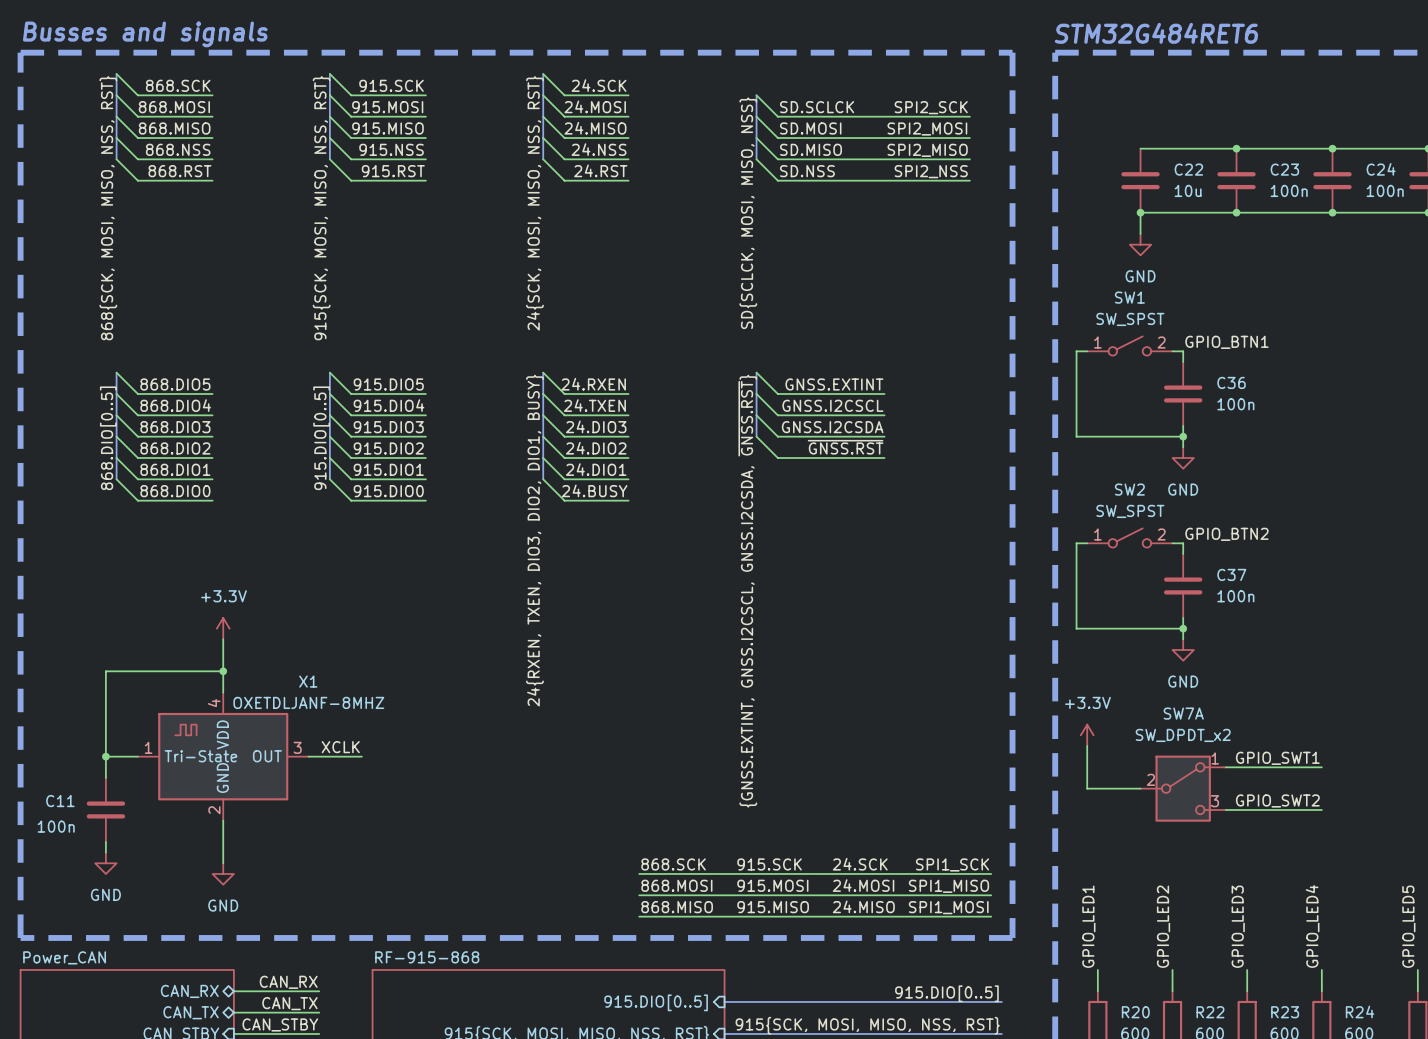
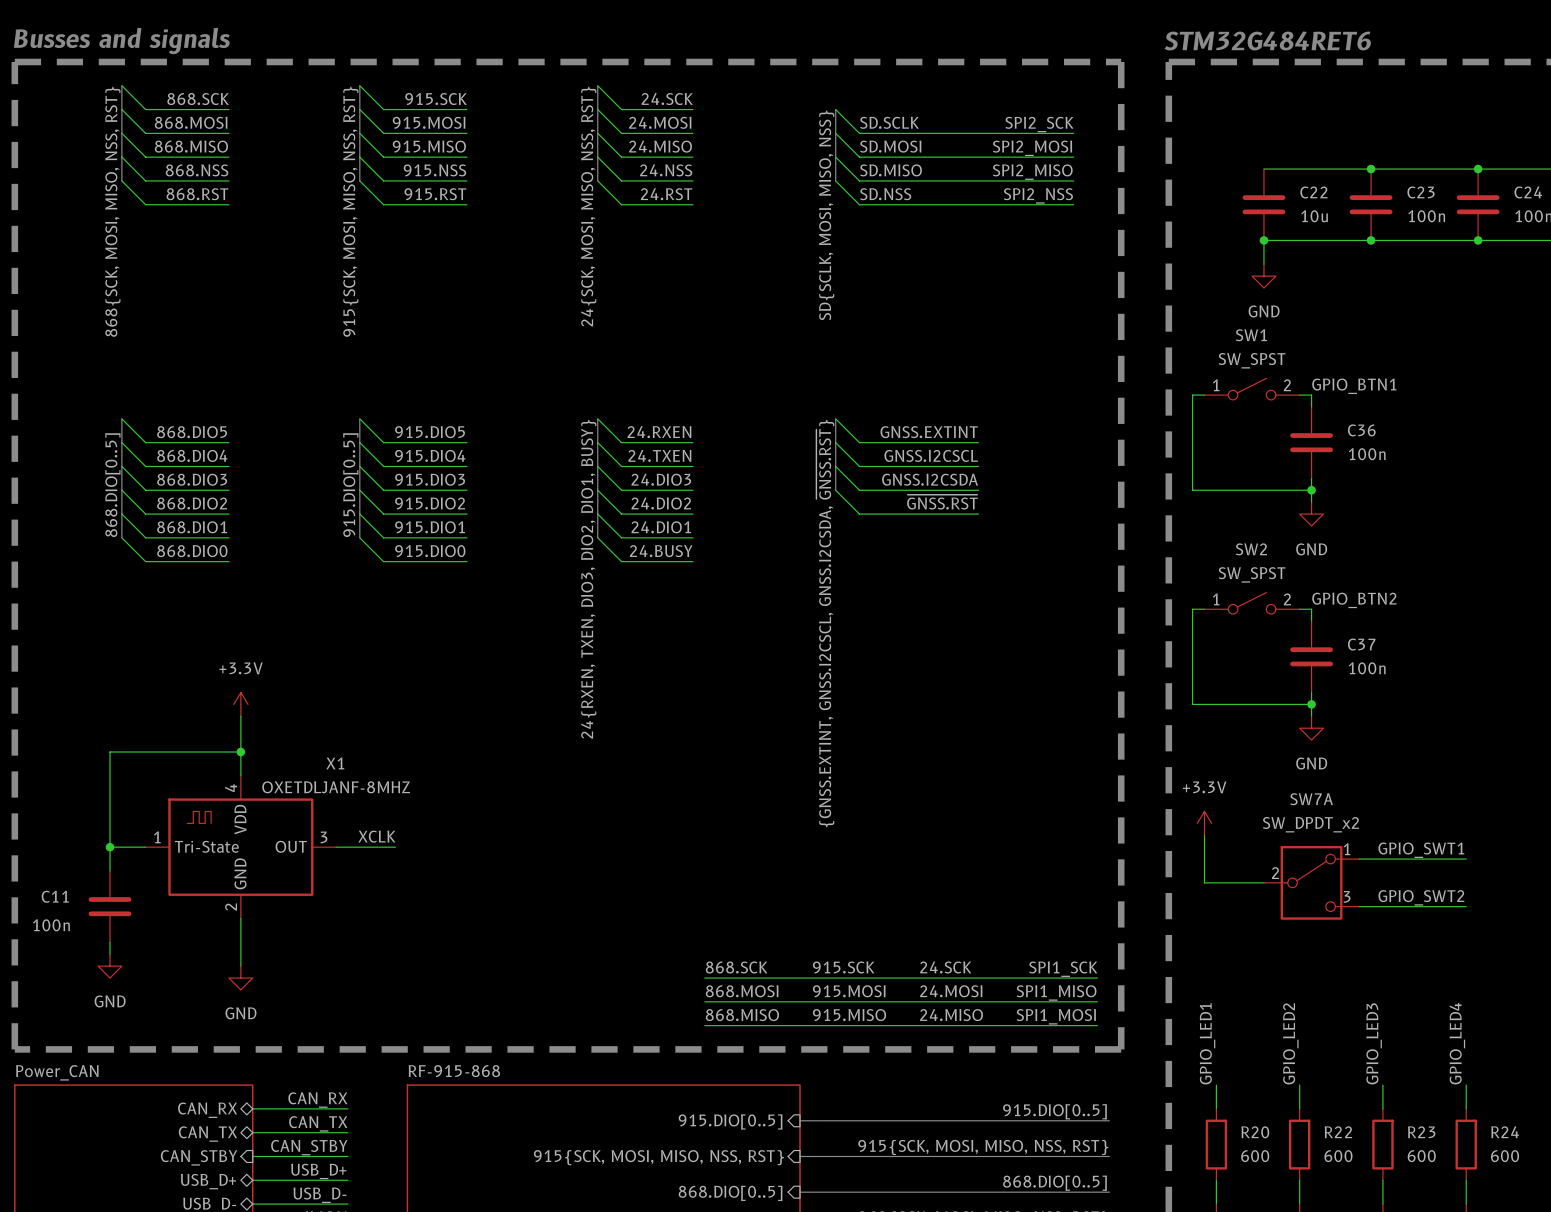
label: SD.SCLCK (817, 107) -> SD.SCLK (889, 122)
label: SD{SCLCK, MOSI, MISO, NSS} (748, 213) -> SD{SCLK, MOSI, MISO, NSS} (826, 215)

